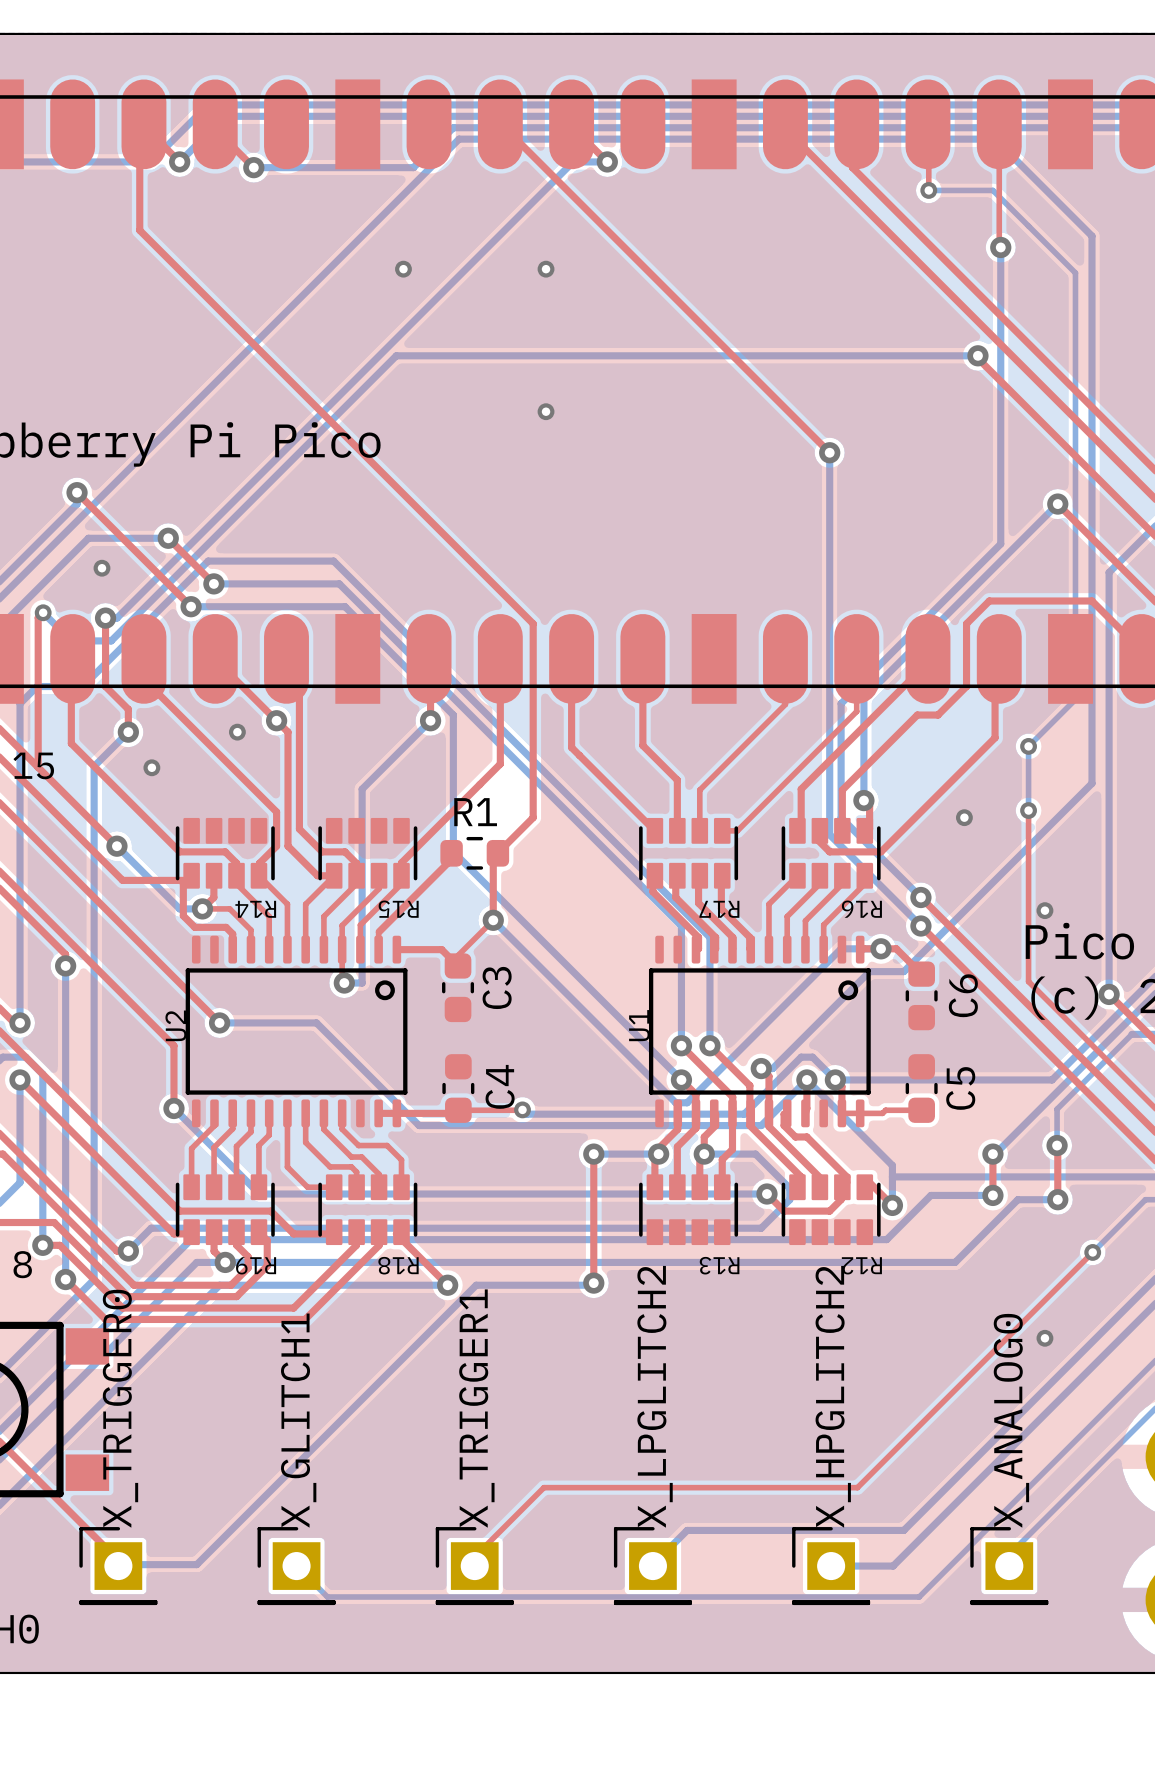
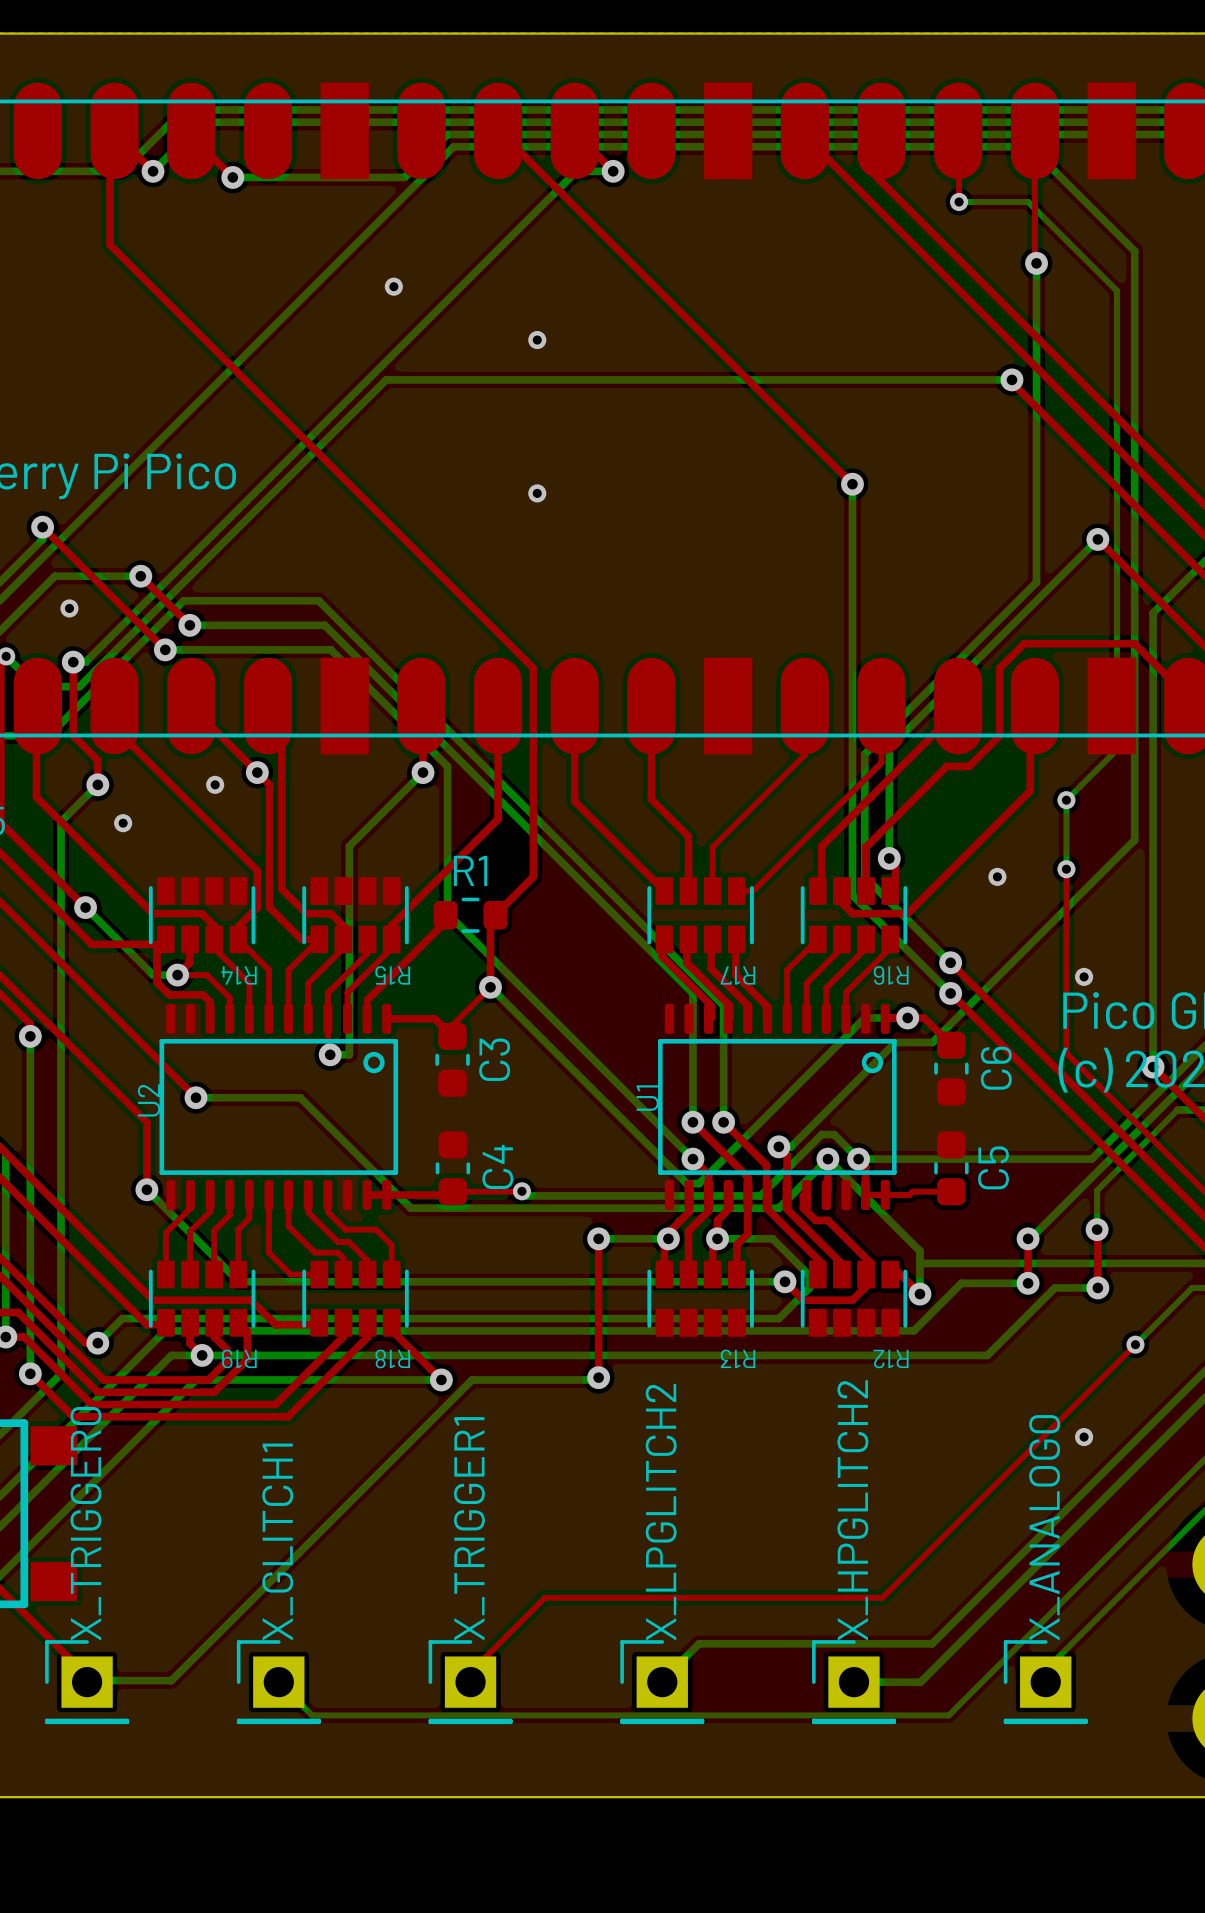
via: (546, 269) -> none
via: none -> (537, 340)
via: (546, 411) -> none
via: none -> (537, 493)

